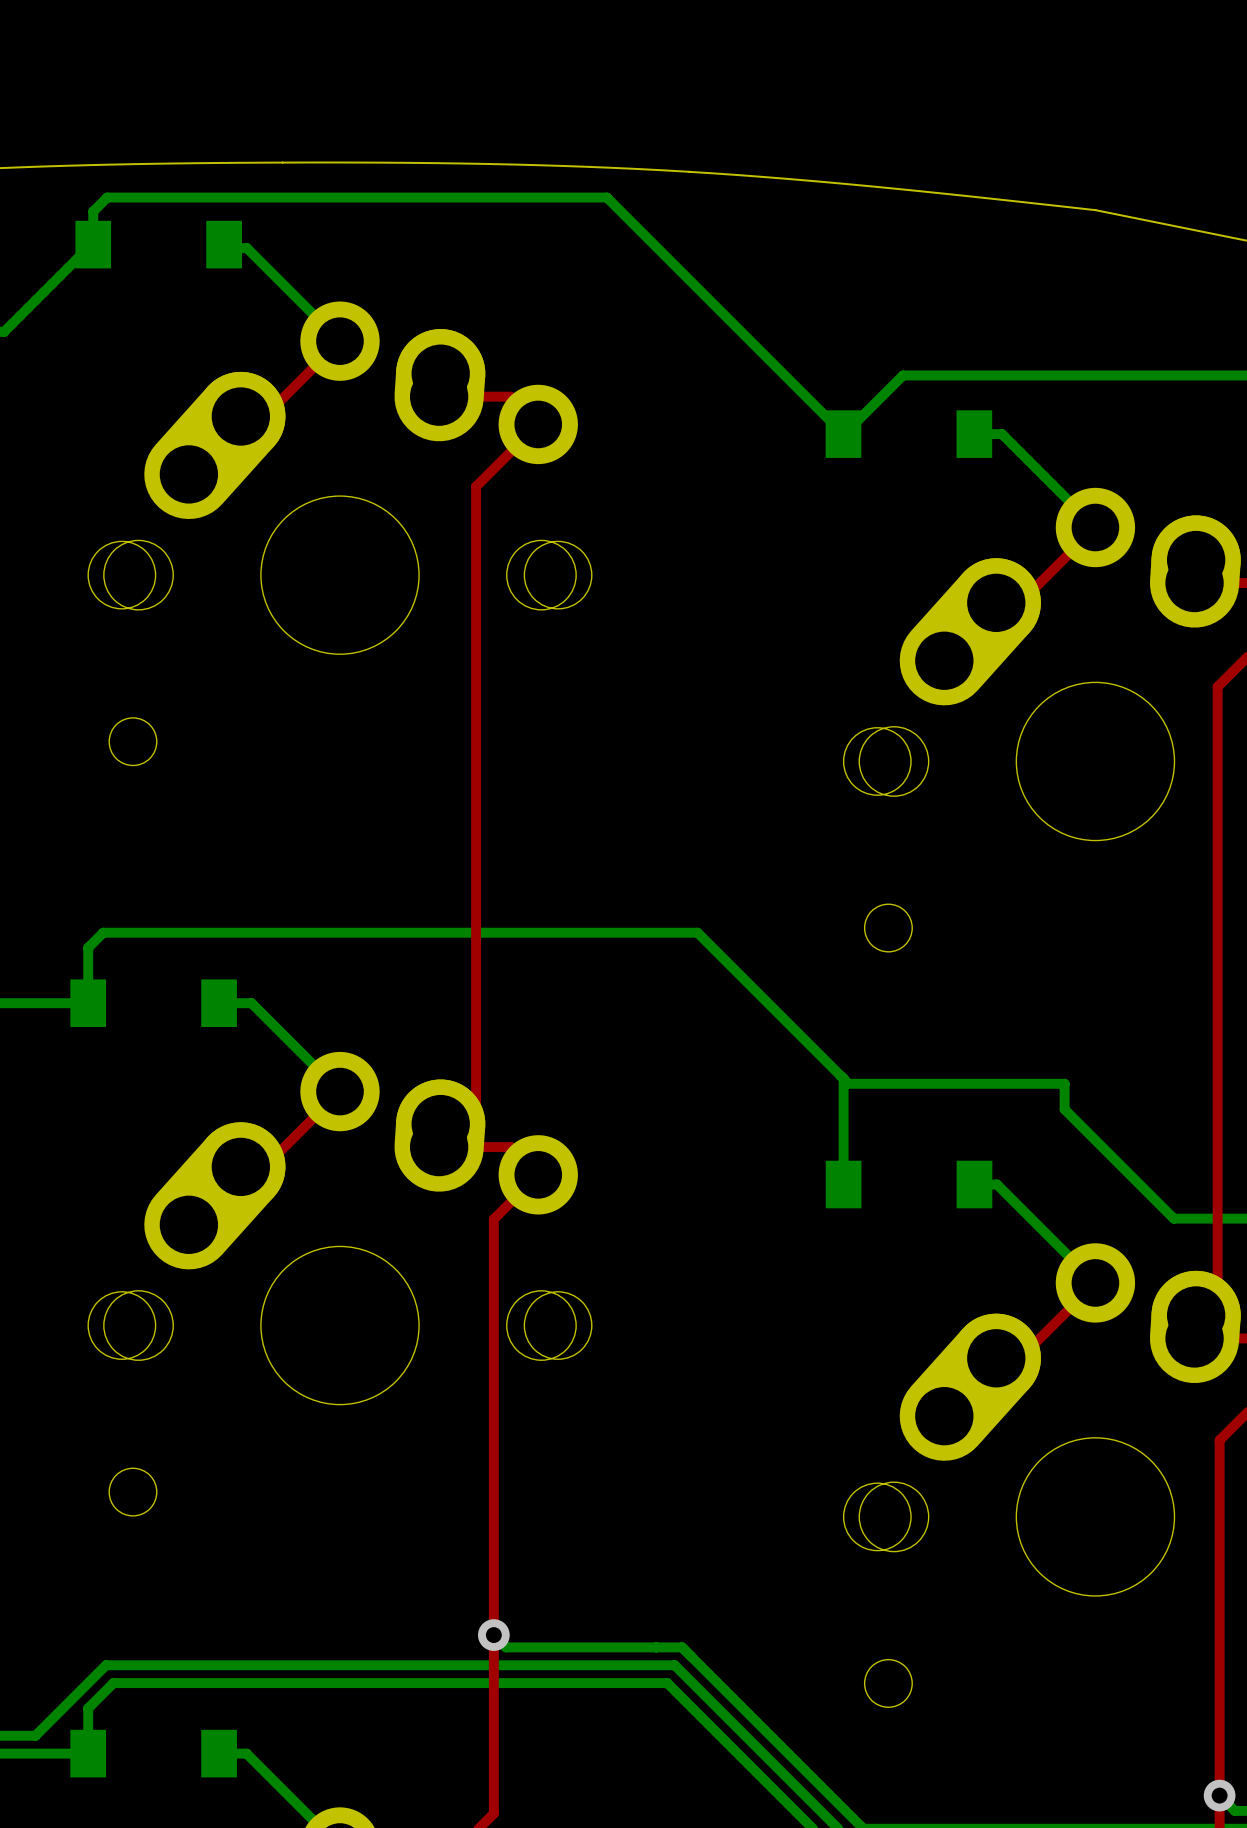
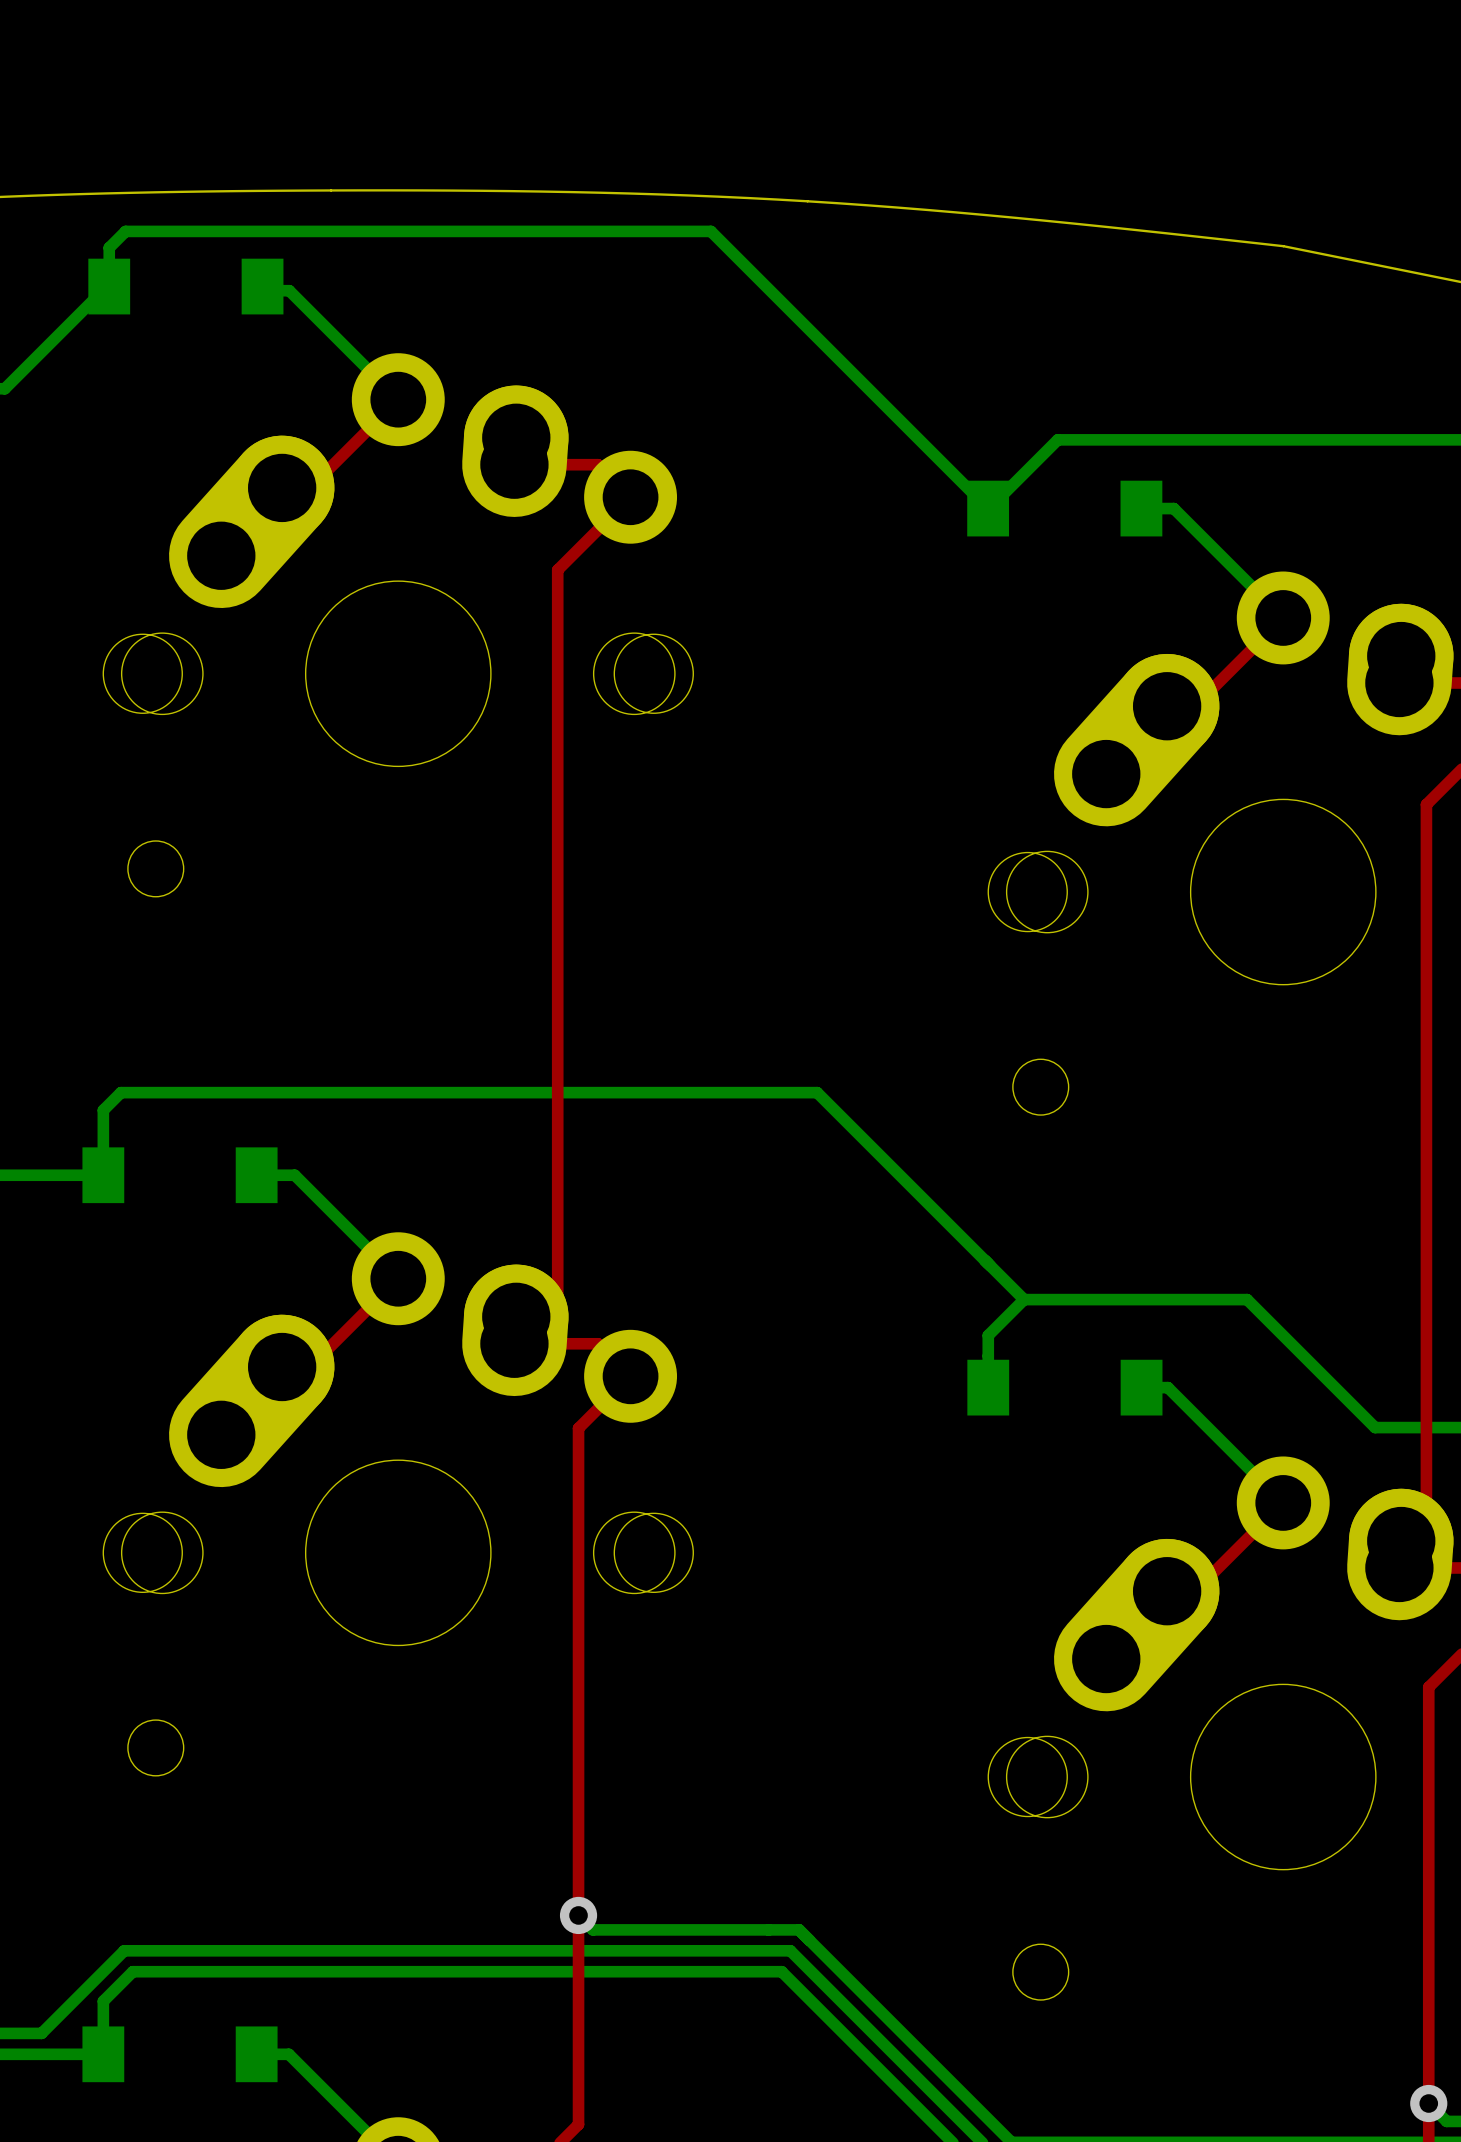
bottom track: (843, 1078) (843, 1139) -> (1024, 1299) (988, 1335)
bottom track: none -> (990, 1266) (1024, 1299)
bottom track: (848, 1083) (1064, 1083) (1064, 1109) -> (1024, 1299) (1247, 1299)

